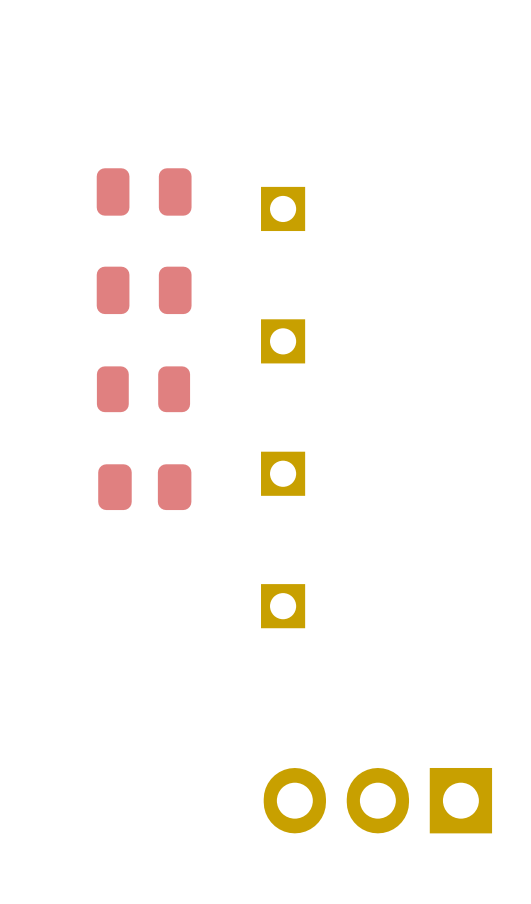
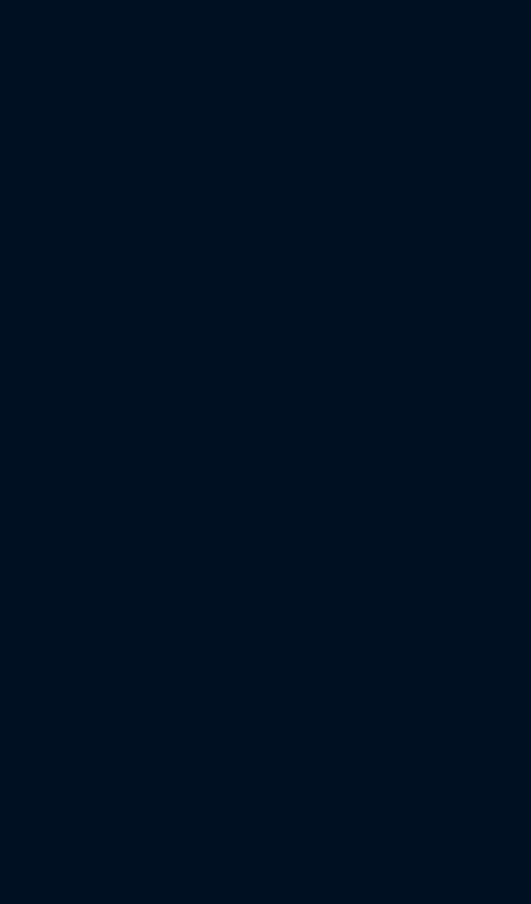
part: (144, 191) -> none
part: (283, 208) -> none
part: (144, 290) -> none
part: (283, 341) -> none
part: (143, 389) -> none
part: (283, 473) -> none
part: (144, 487) -> none
part: (283, 606) -> none
part: (377, 800) -> none

